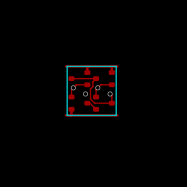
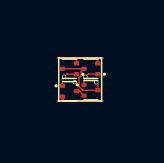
part footprint: [68, 70, 91, 88] -> [59, 58, 85, 80]
part footprint: [92, 70, 115, 88] -> [81, 58, 106, 80]
part footprint: [68, 94, 91, 112] -> [54, 80, 80, 102]
part footprint: [92, 94, 115, 112] -> [75, 79, 101, 101]

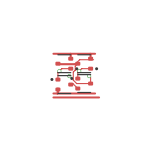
line: (58, 58) (101, 58) (101, 100) (58, 100) (58, 58) -> none
track: none -> (93, 59) (79, 59) (74, 64) (58, 64)
track: none -> (53, 97) (99, 97)

